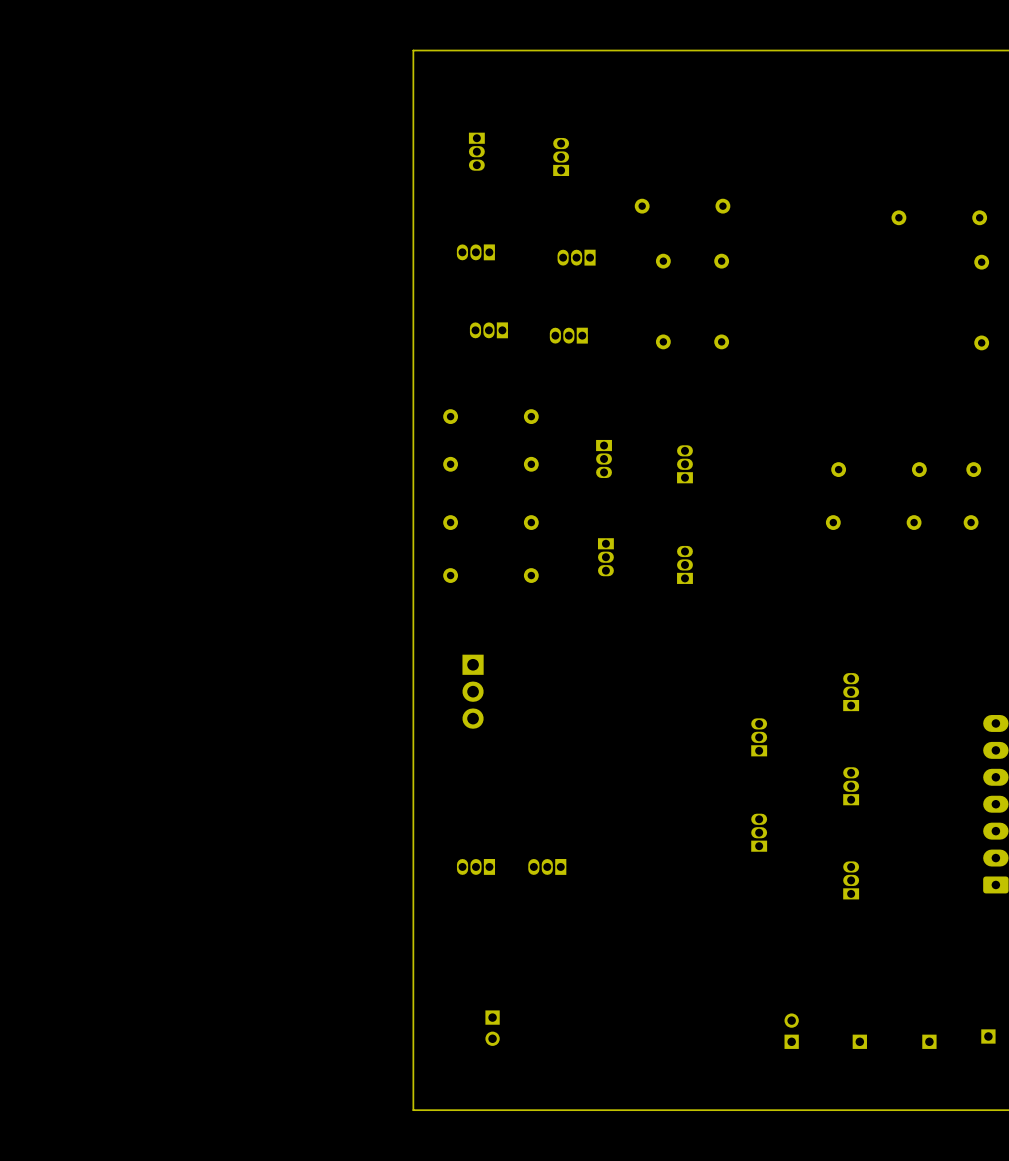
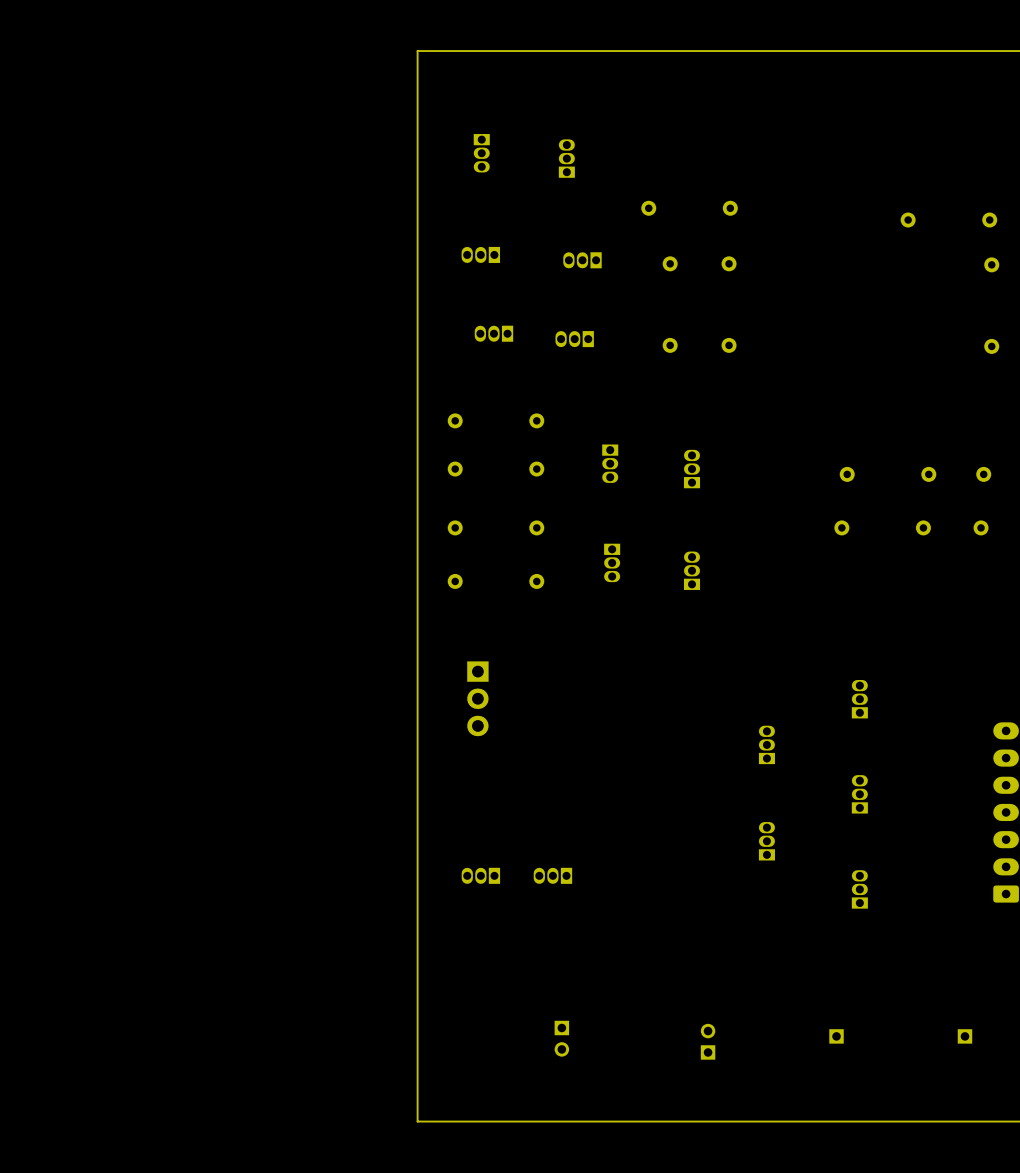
part: none -> (964, 1036)
part position: (492, 1028) -> (561, 1038)
part position: (791, 1031) -> (708, 1041)
part: (988, 1036) -> none
part position: (859, 1041) -> (836, 1036)
part: (929, 1041) -> none

